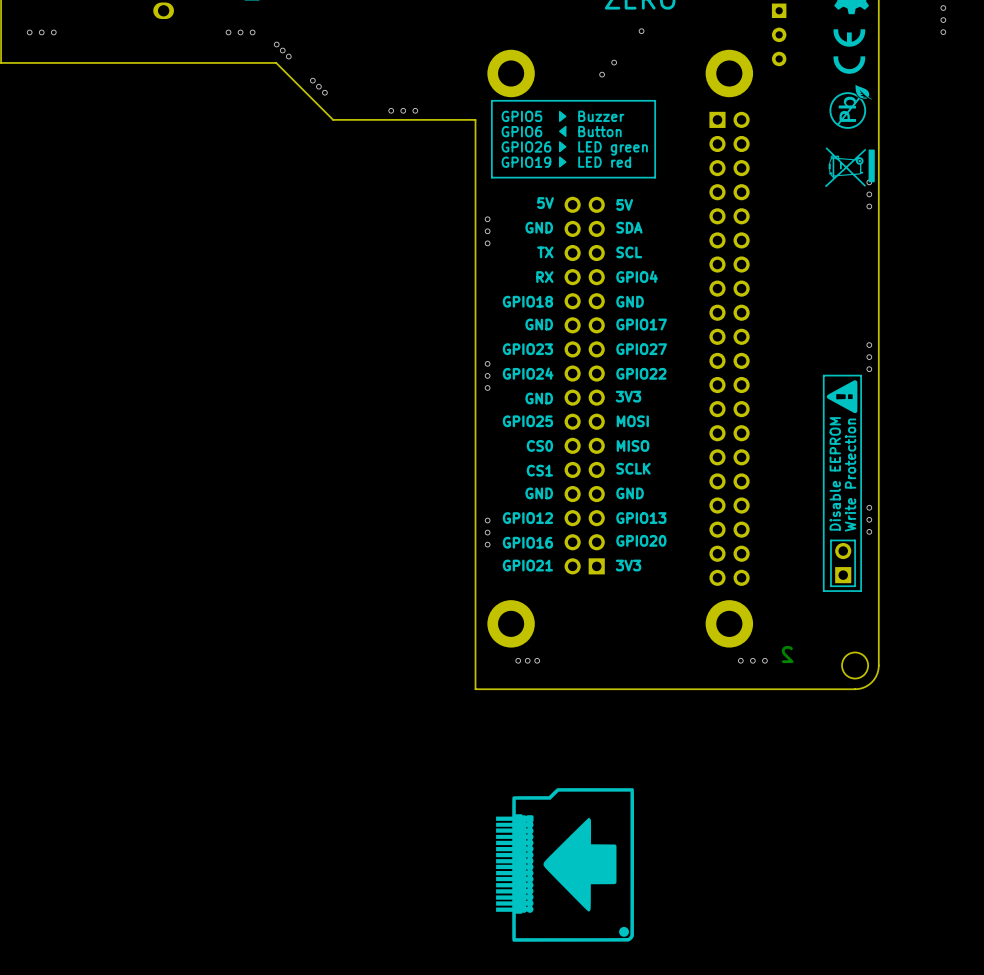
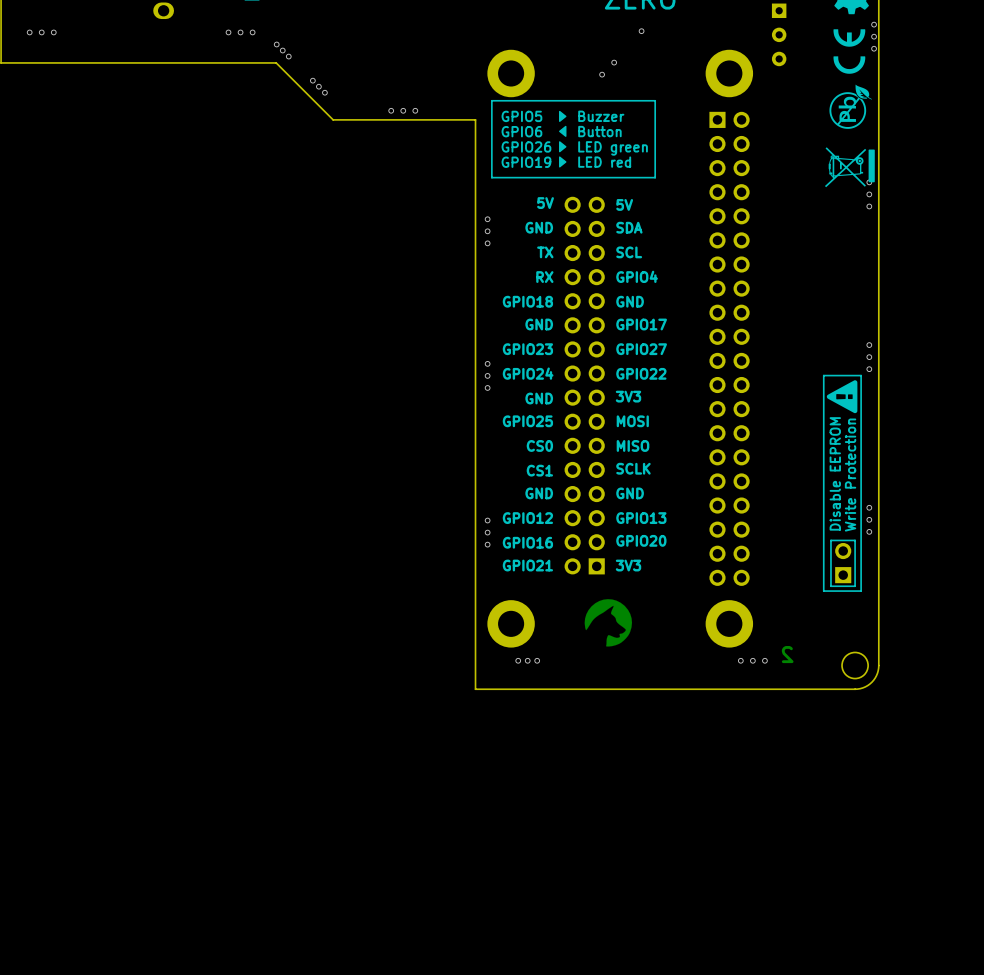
via: (943, 8) -> none
via: (943, 20) -> none
via: none -> (874, 24)
via: (943, 32) -> none
via: none -> (874, 36)
via: none -> (874, 48)
drawing: none -> [584, 599, 633, 647]
drawing: [496, 788, 635, 942] -> none

